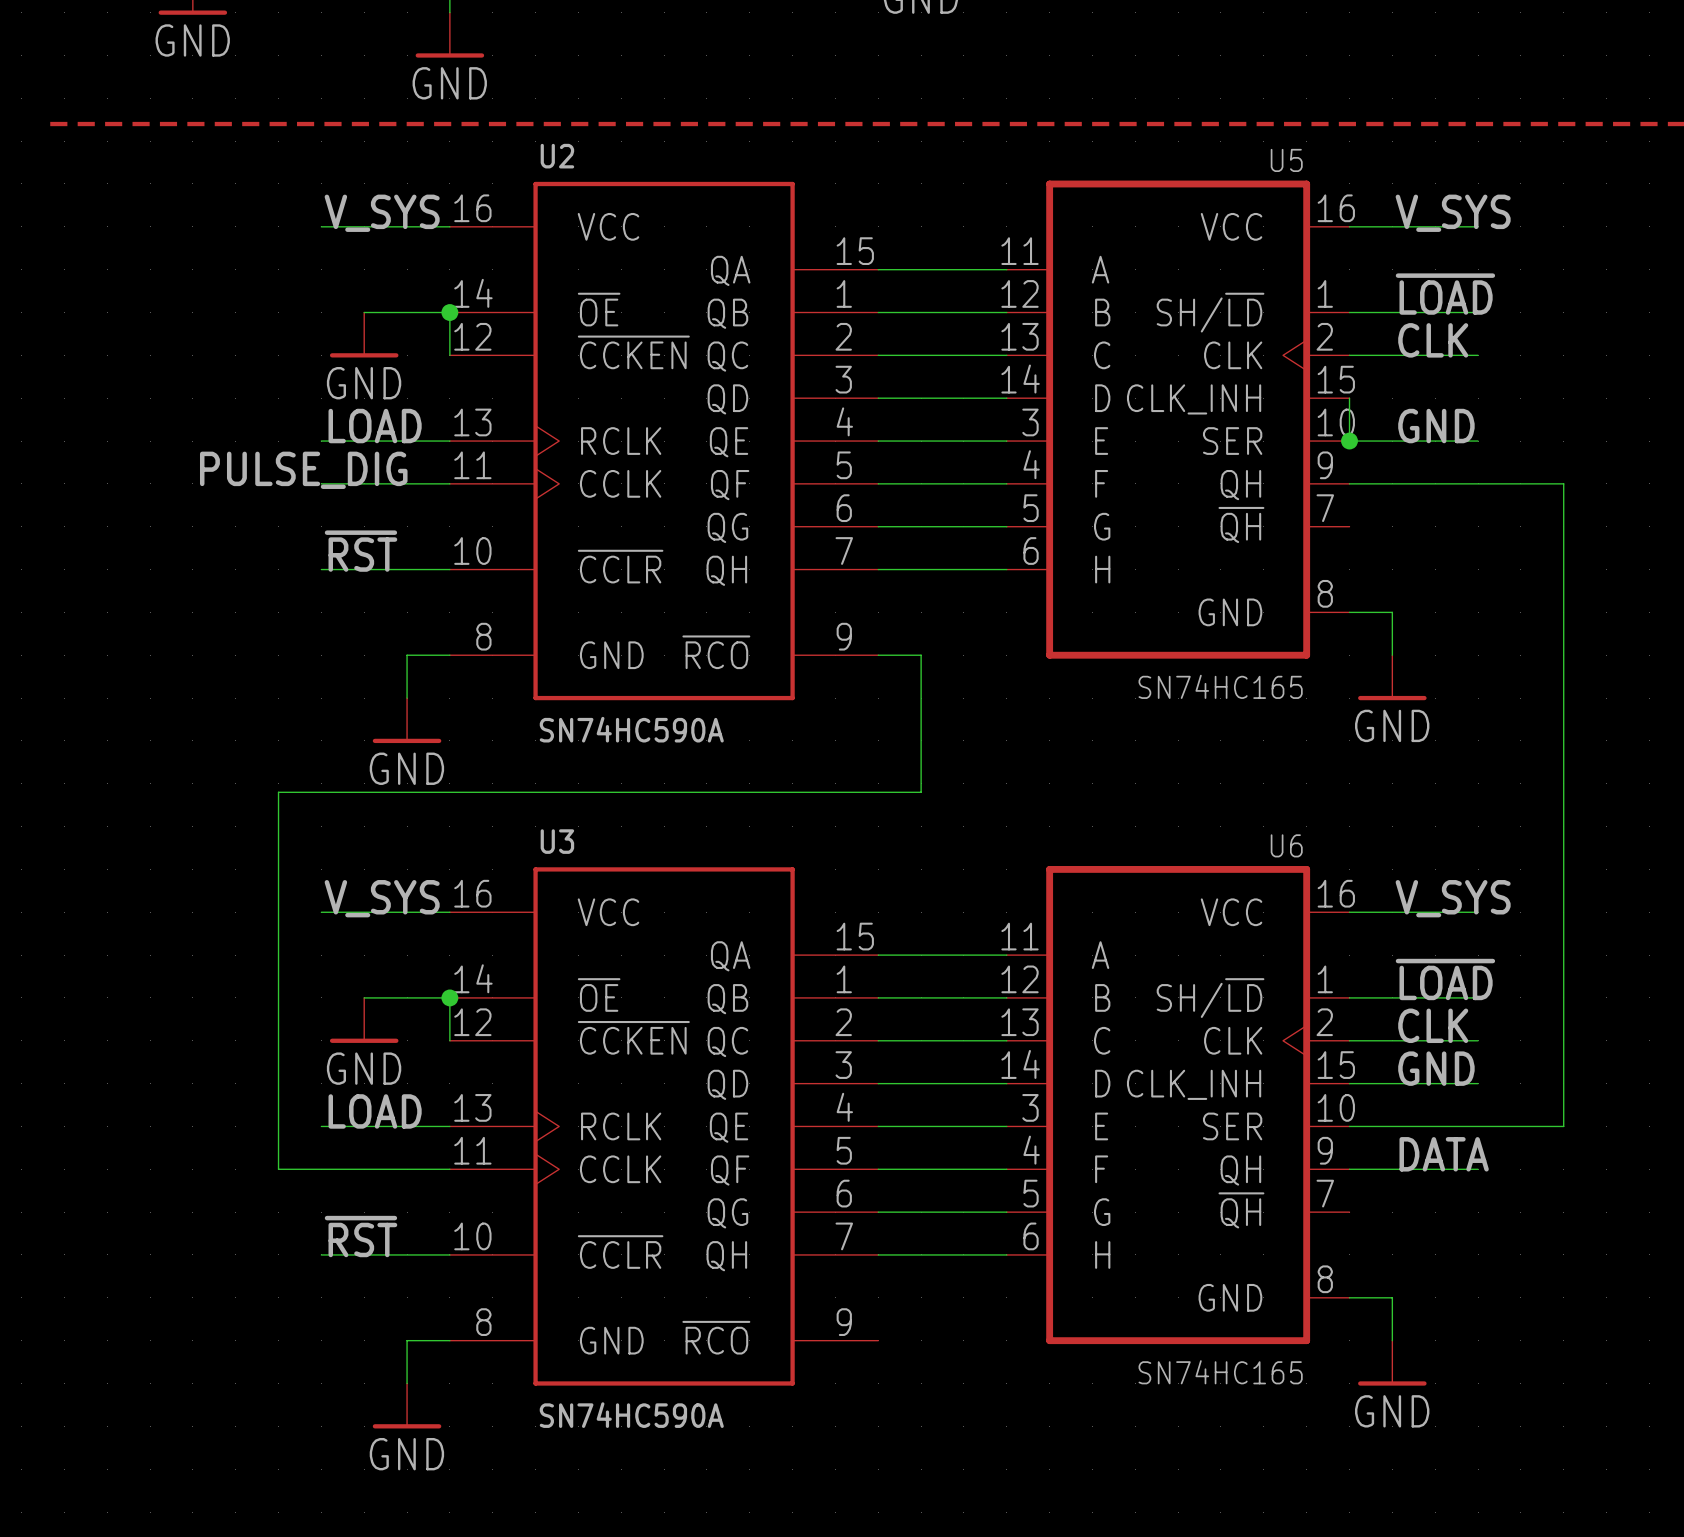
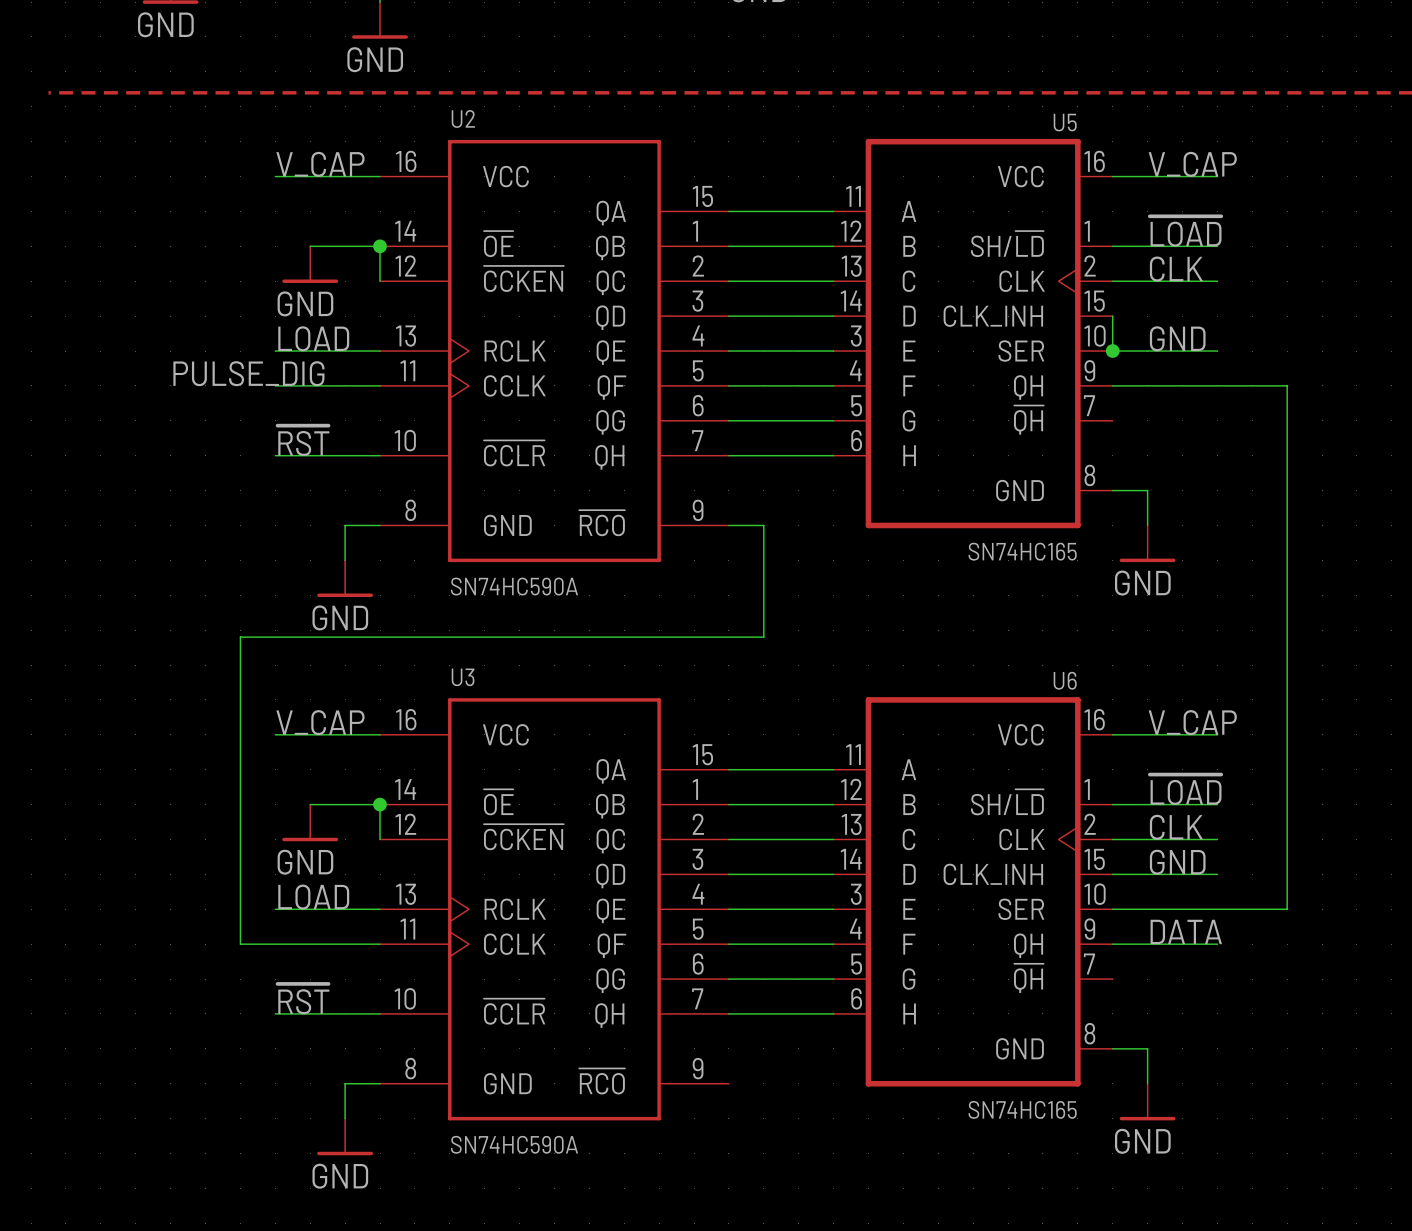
label: V_SYS (382, 213) -> V_CAP (320, 164)
label: V_SYS (1453, 213) -> V_CAP (1192, 164)
label: V_SYS (382, 898) -> V_CAP (320, 722)
label: V_SYS (1453, 898) -> V_CAP (1192, 722)

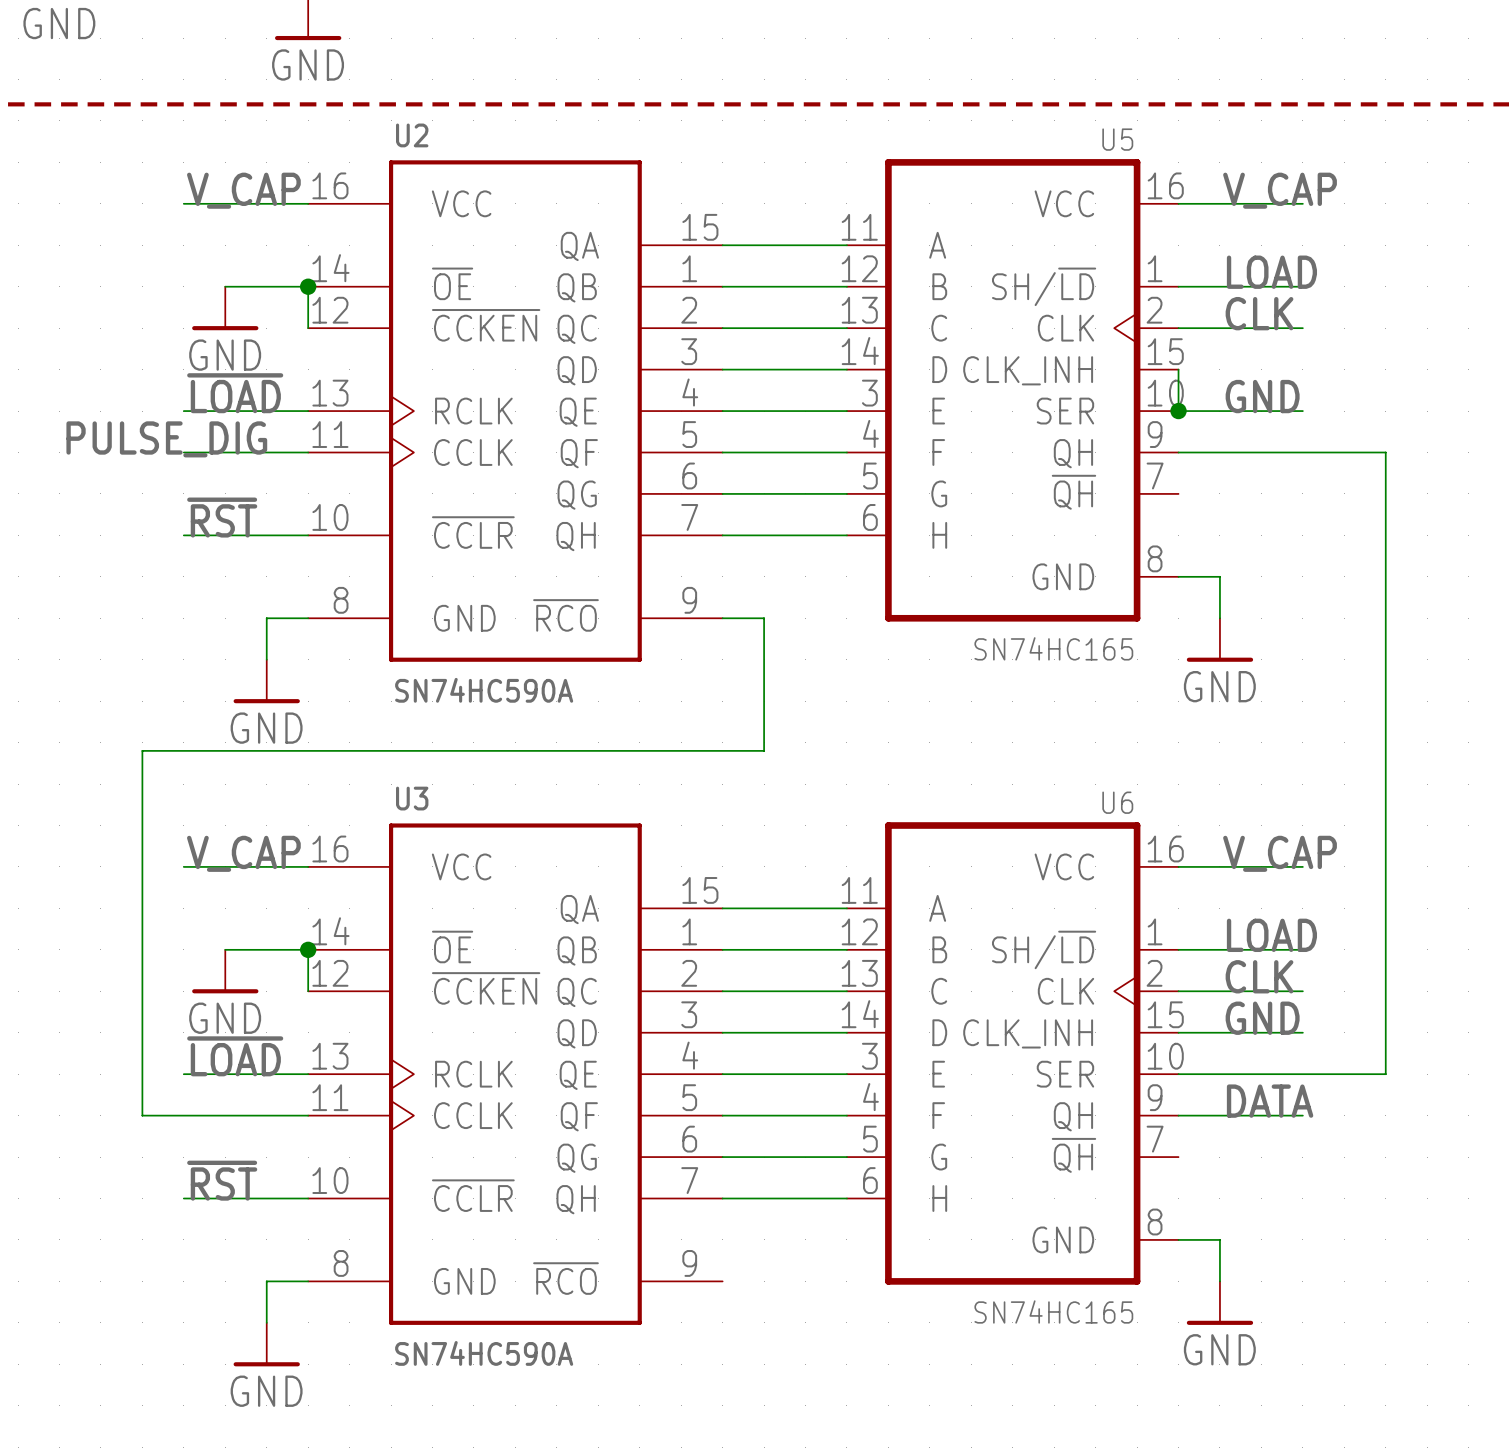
label: ~{LOAD} (1185, 231) -> LOAD (1271, 272)
label: LOAD (313, 338) -> ~{LOAD} (235, 393)
label: ~{LOAD} (1185, 789) -> LOAD (1271, 935)
label: LOAD (313, 897) -> ~{LOAD} (235, 1056)

